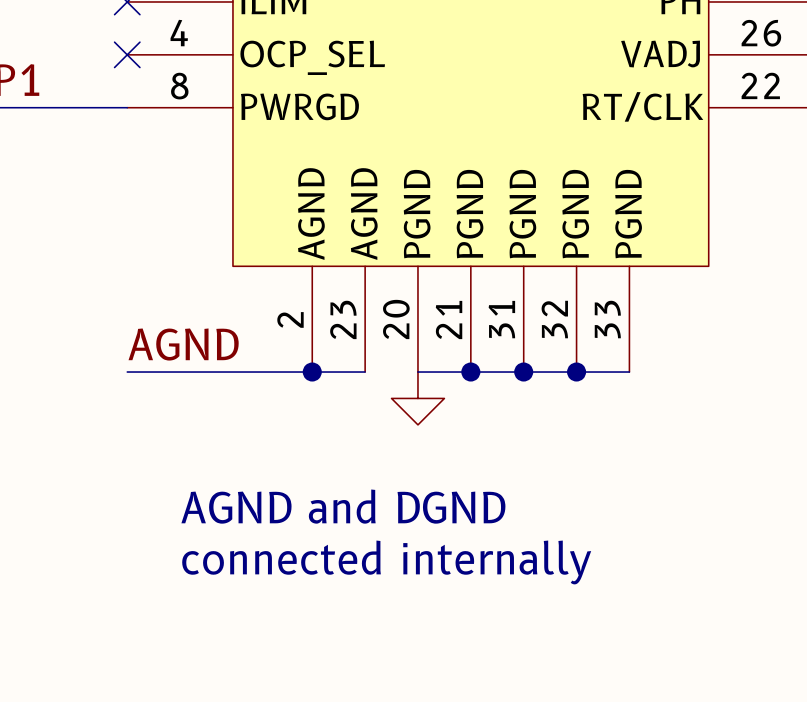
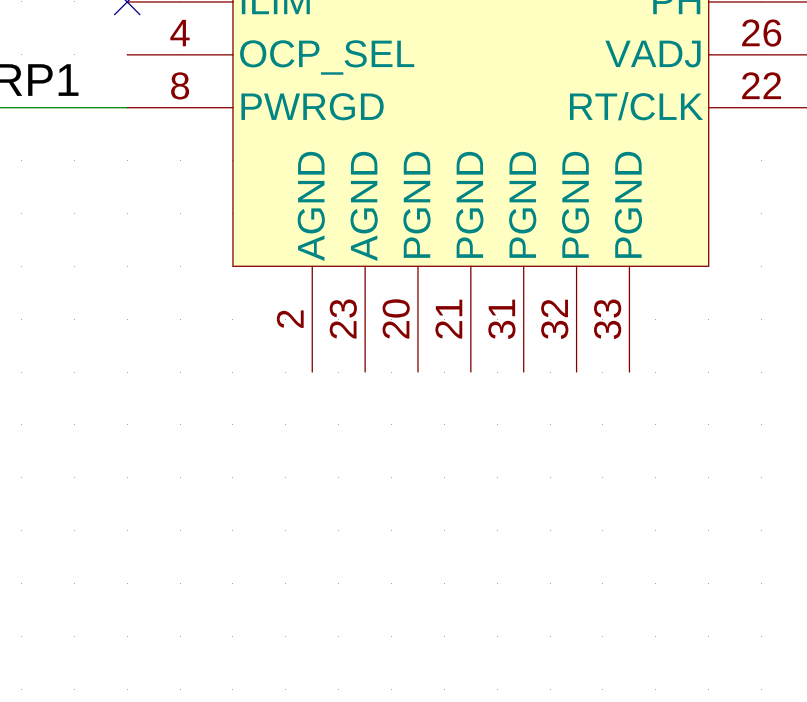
no-connect mark: (127, 54) -> none
label: AGND (183, 344) -> none
wire: (127, 372) (365, 372) -> none
junction: (312, 372) -> none
wire: (417, 372) (629, 372) -> none
junction: (470, 372) -> none
junction: (523, 372) -> none
junction: (576, 372) -> none
power symbol: (417, 398) -> none
text: AGND and DGND (343, 506) -> none
text: connected internally (386, 562) -> none

